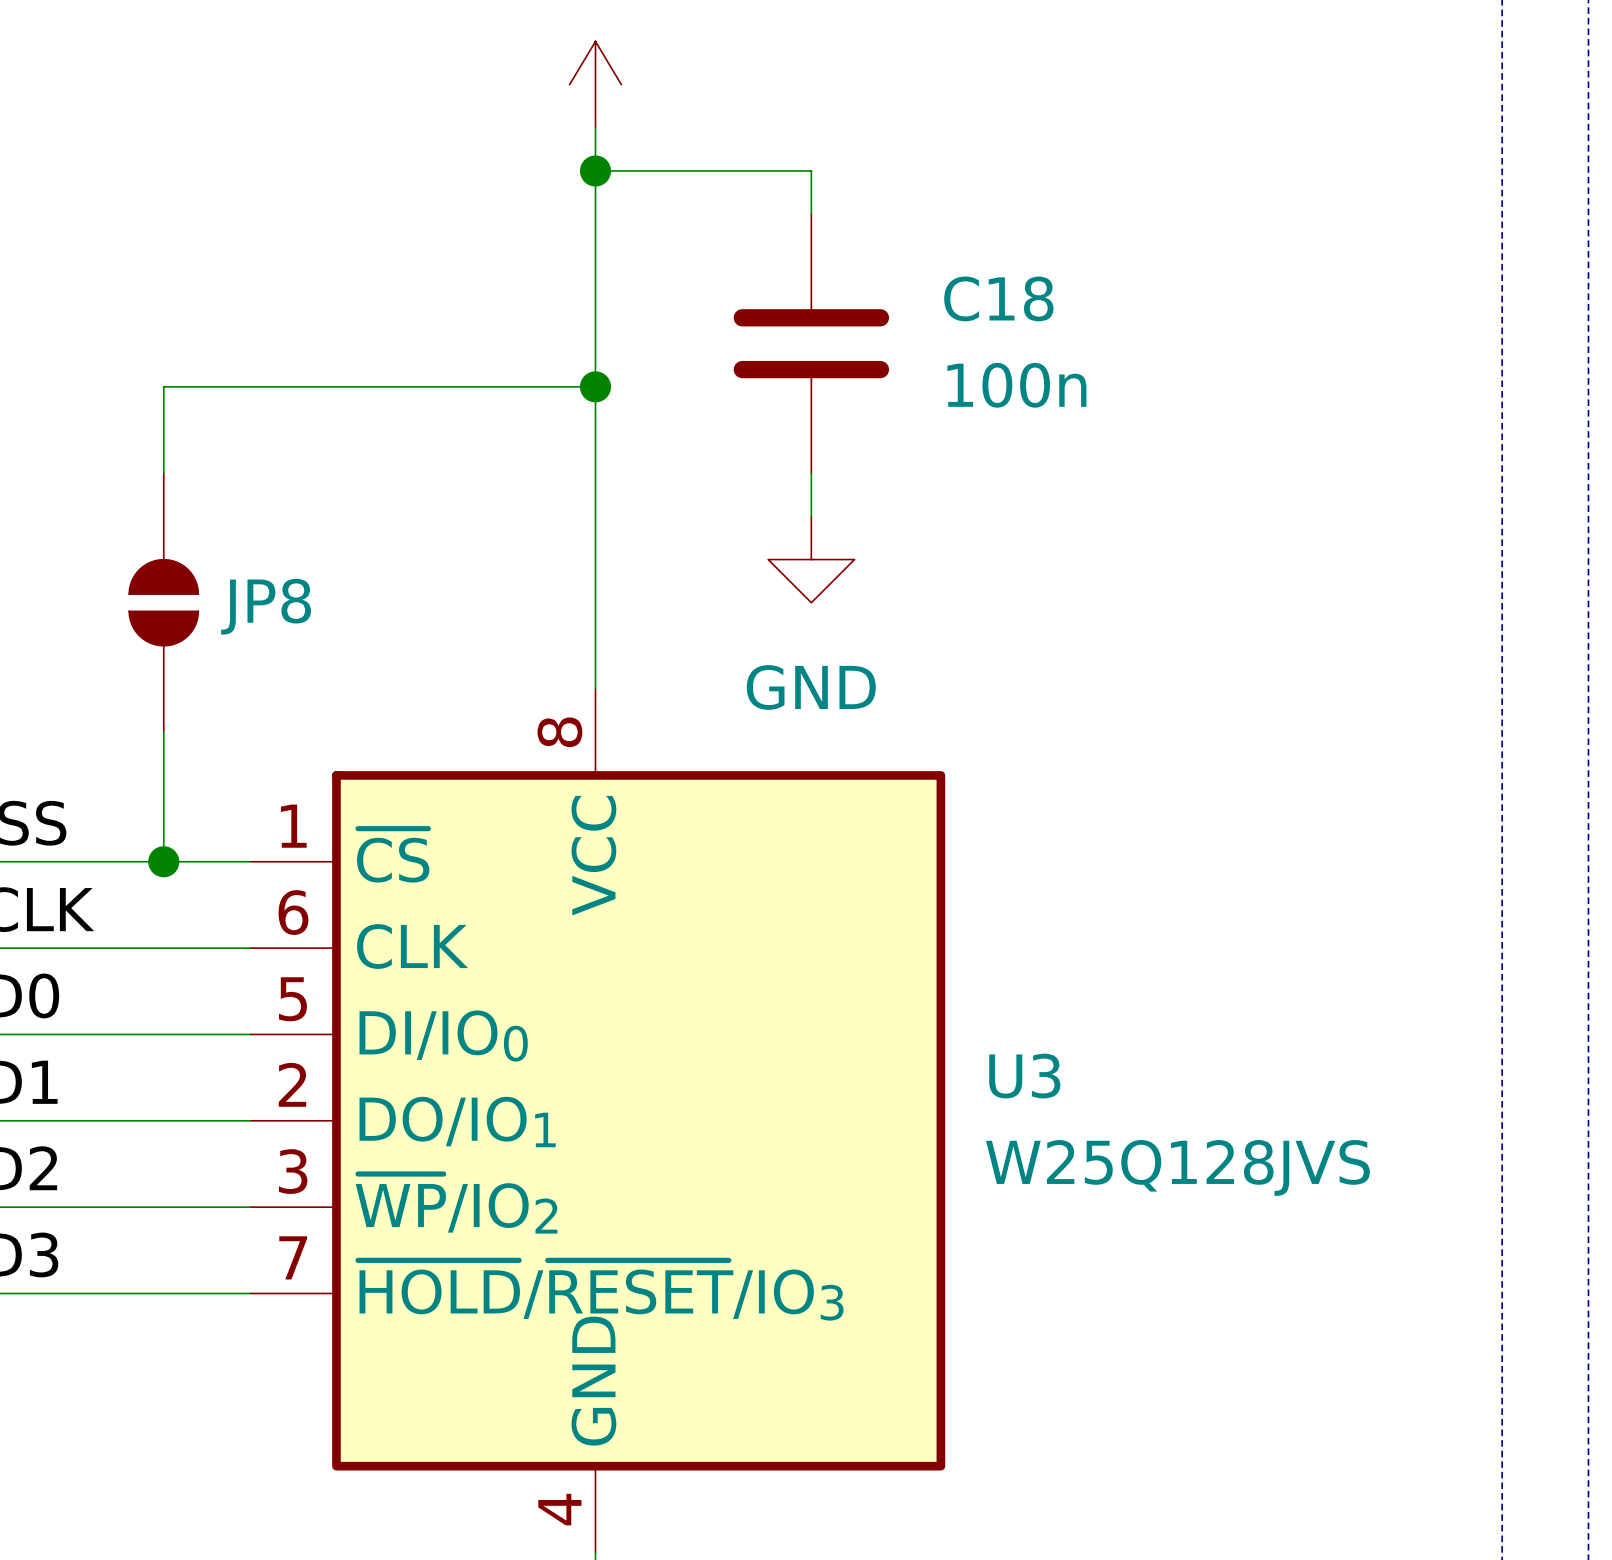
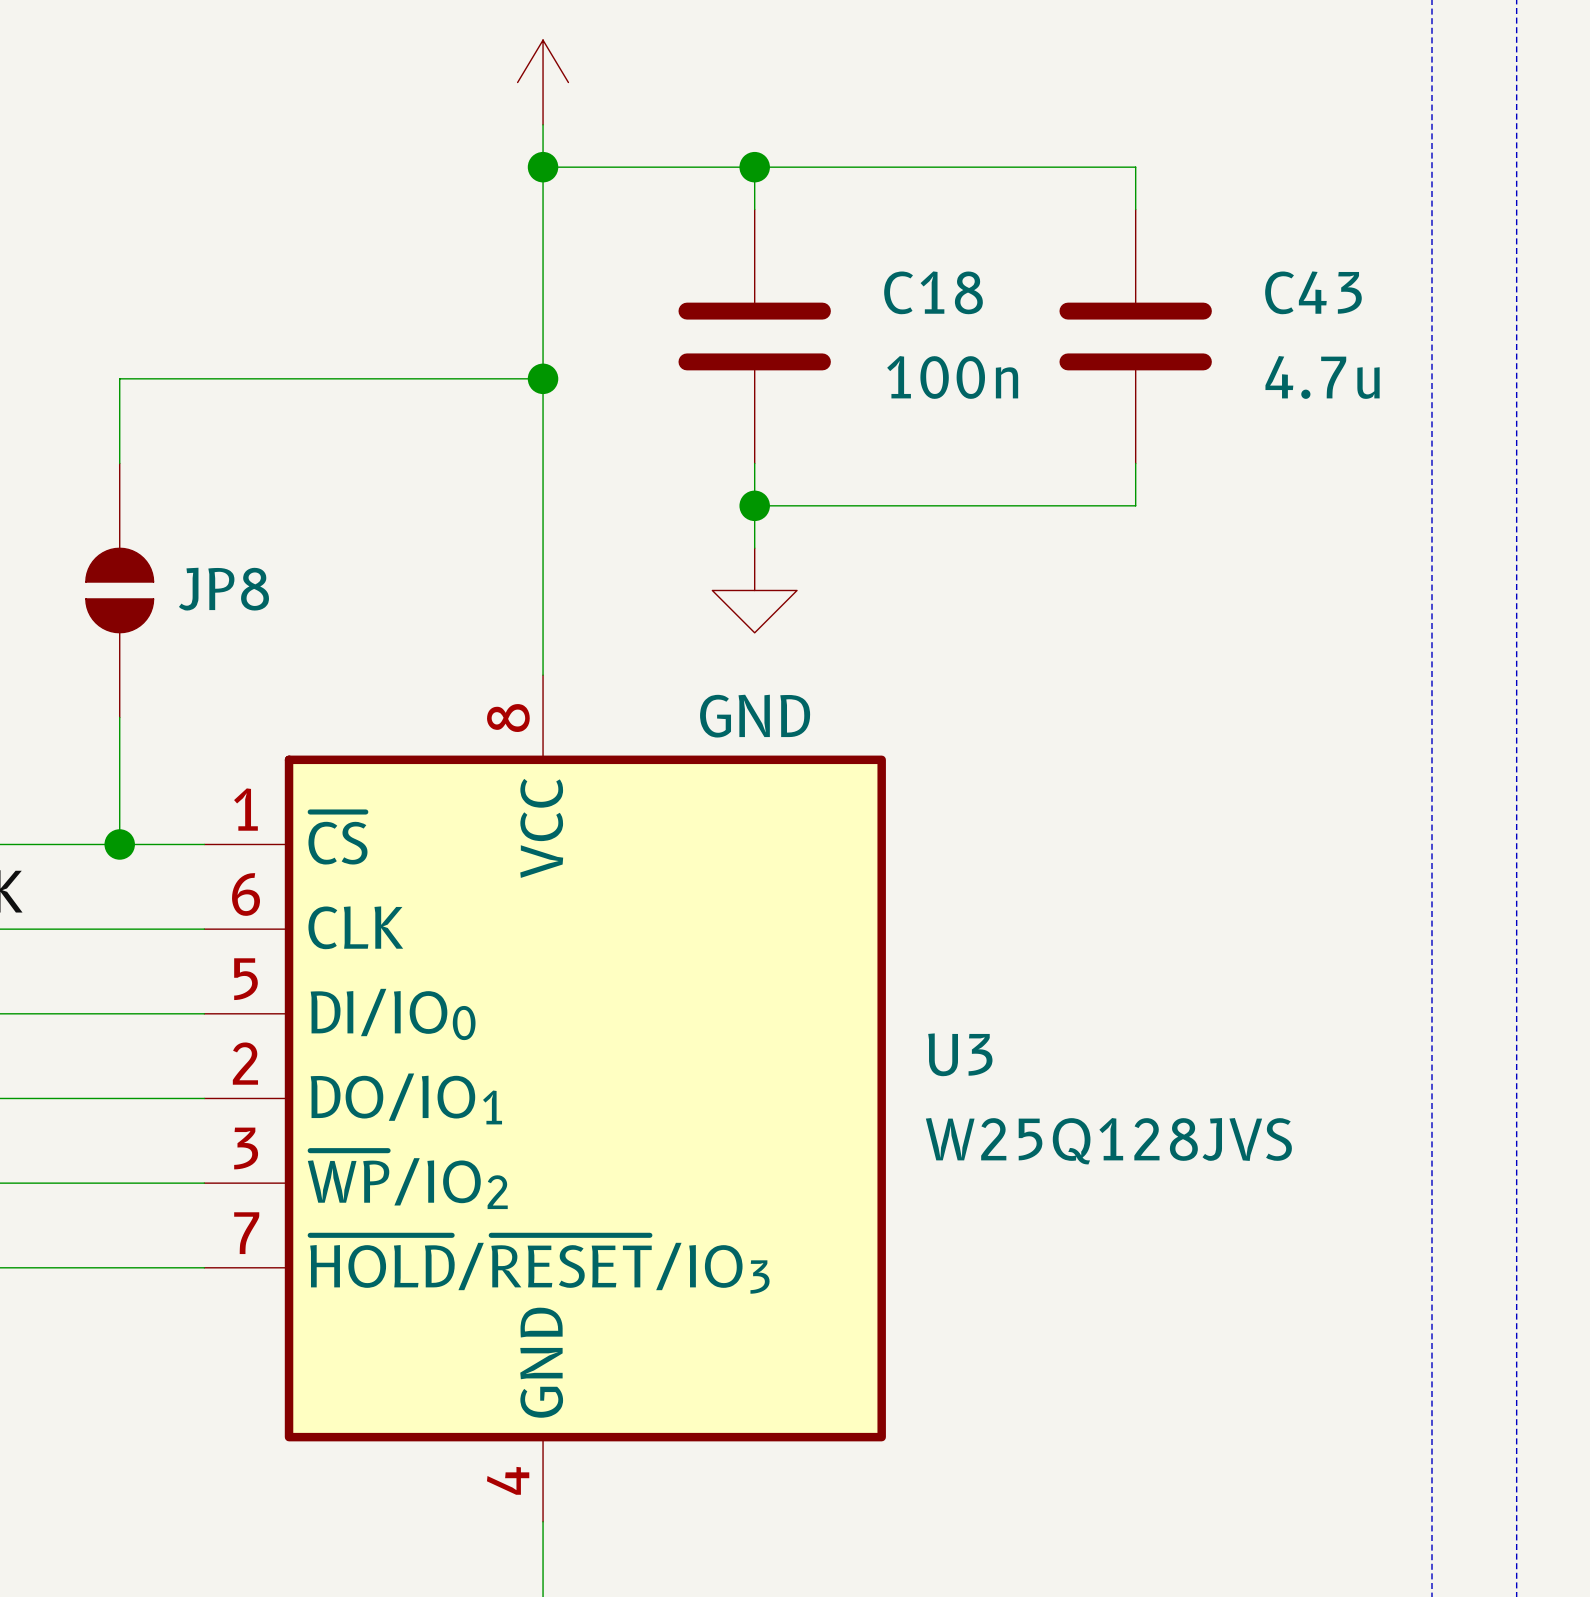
wire: none -> (754, 167) (1135, 167) (1135, 209)
junction: none -> (754, 167)
C43: none -> 4.7u (1135, 336)
wire: none -> (1135, 463) (1135, 505) (754, 505) (754, 548)
junction: none -> (754, 505)
power symbol position: GND (811, 559) -> GND (754, 590)

